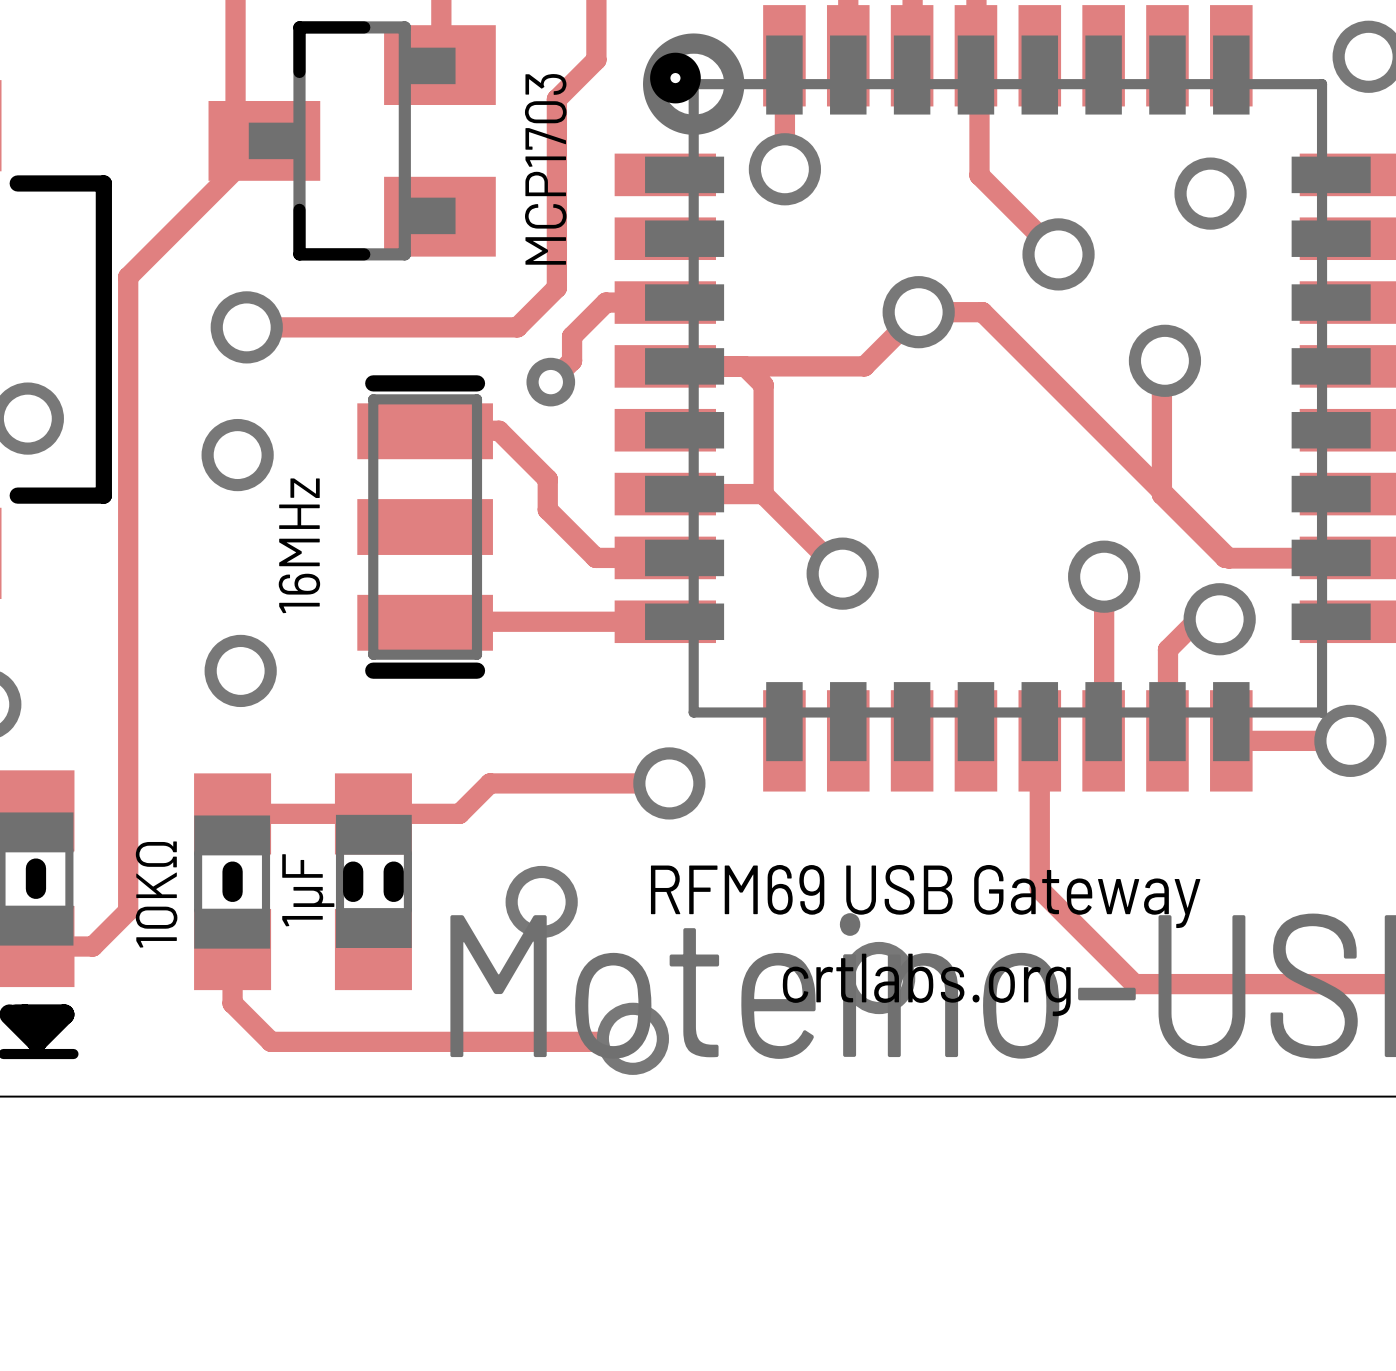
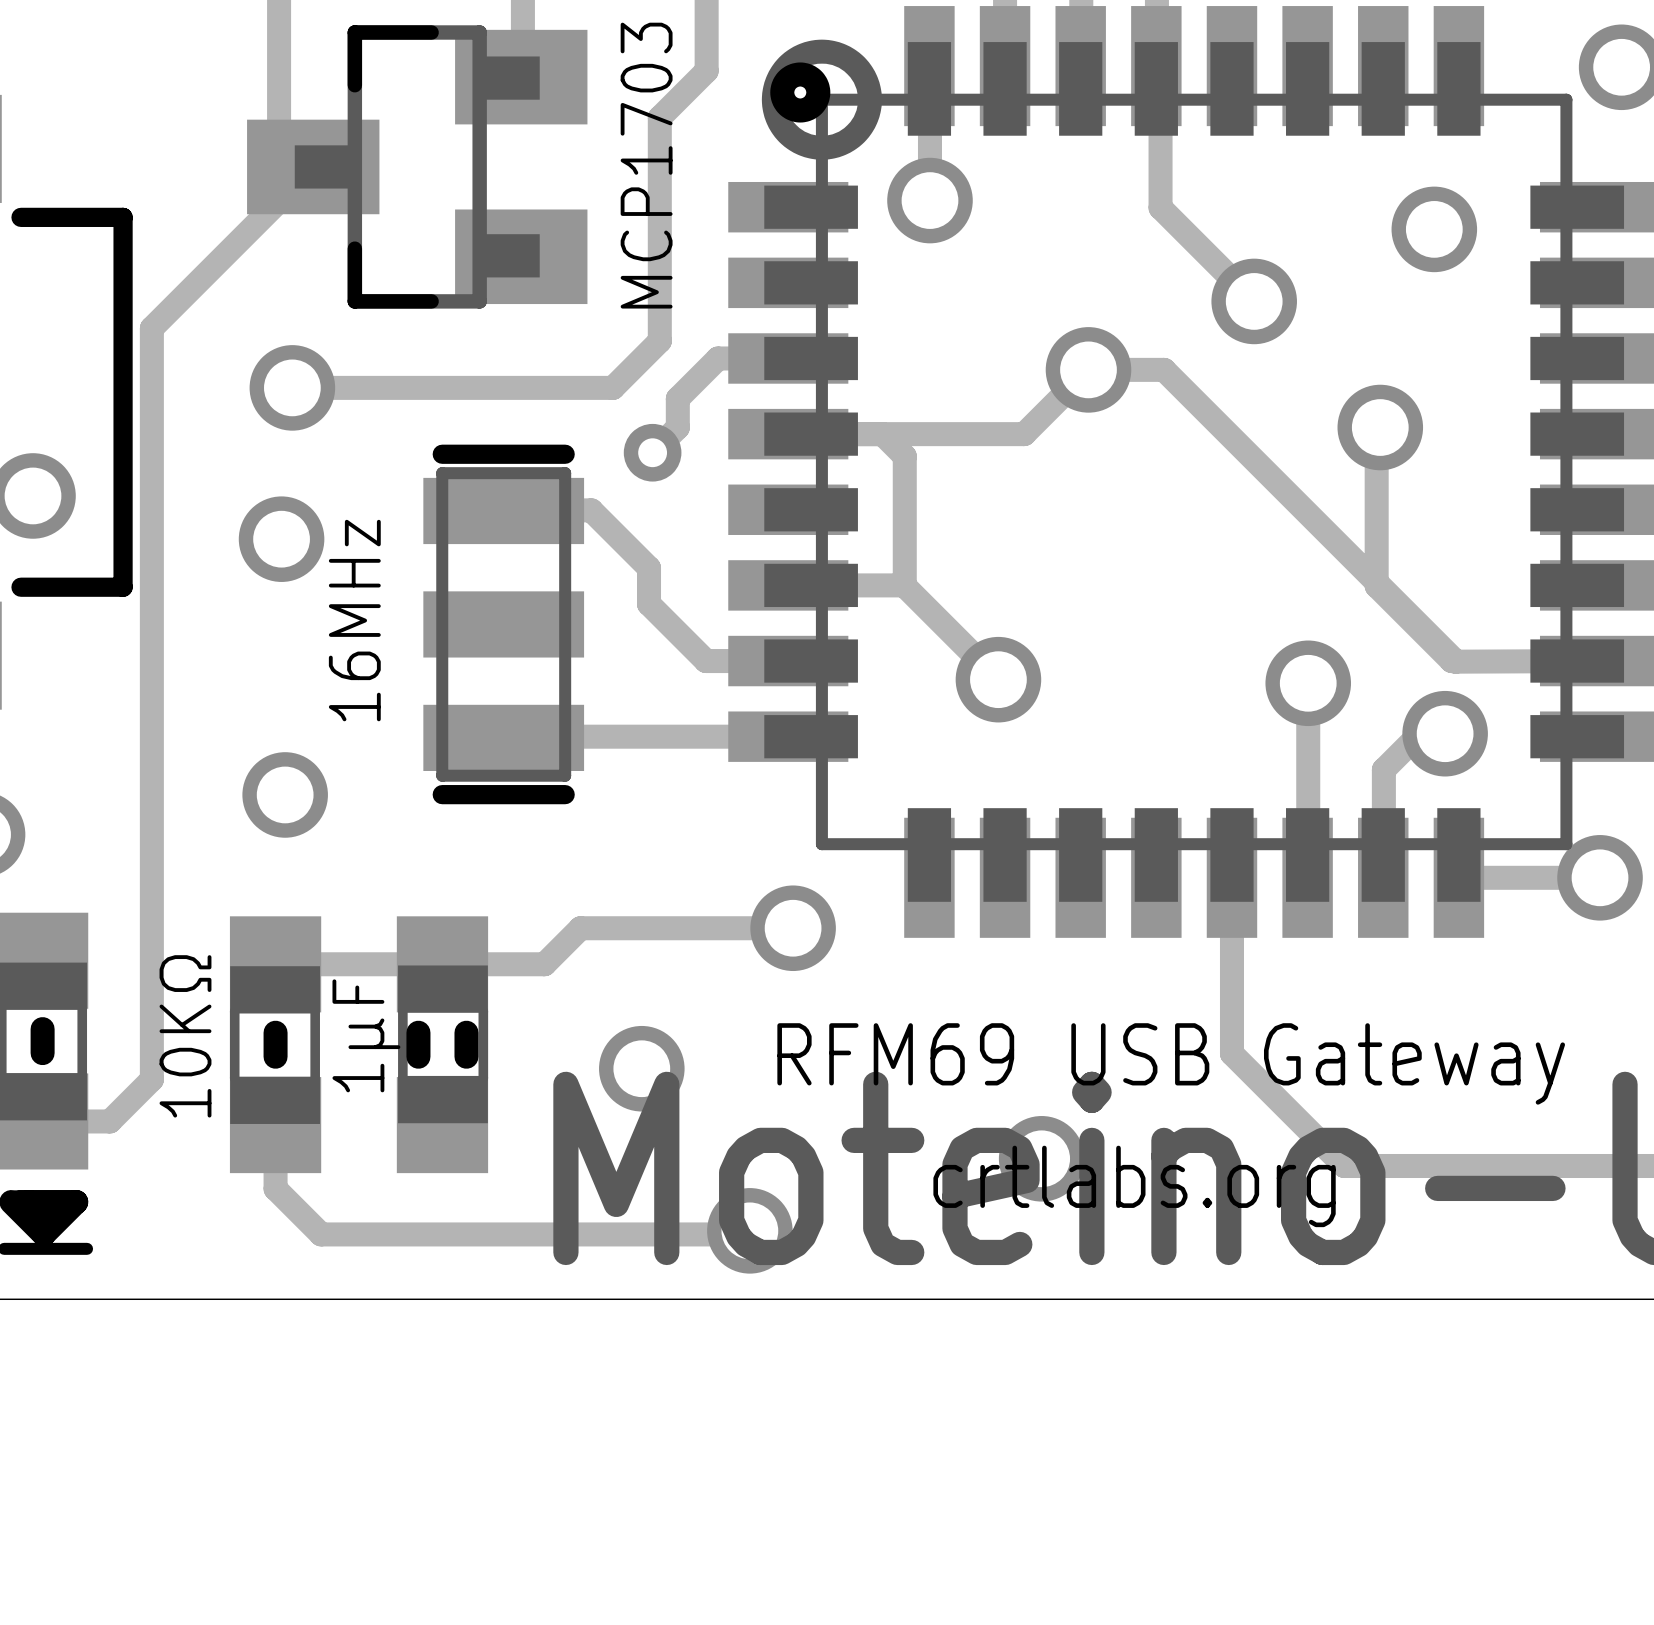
text position: crtlabs.org (926, 984) -> crtlabs.org (1134, 1186)

